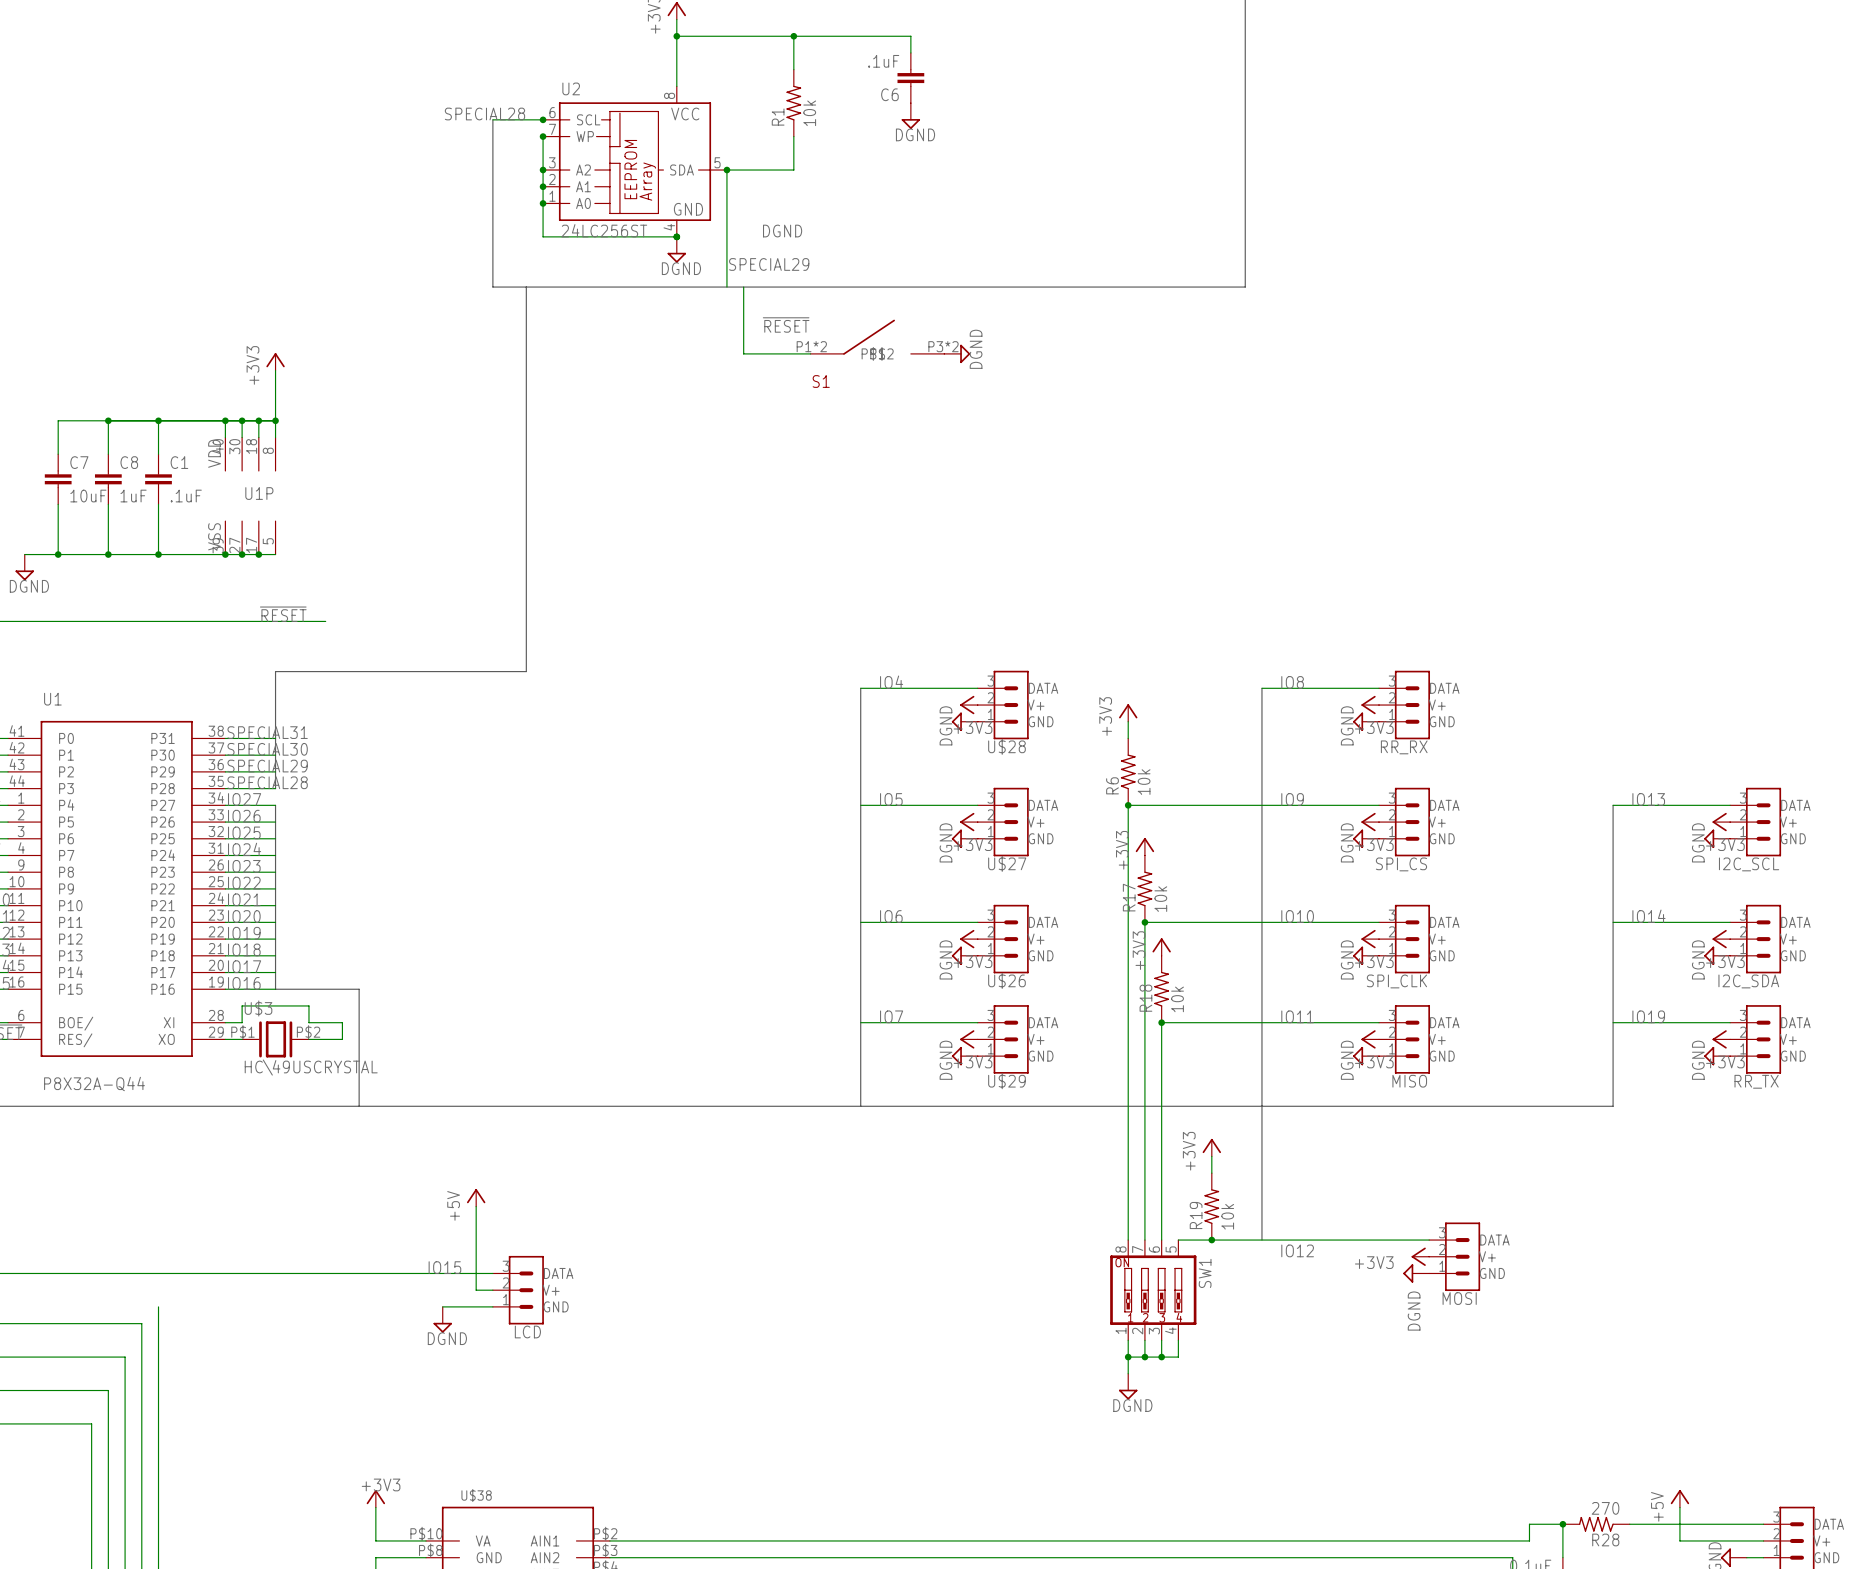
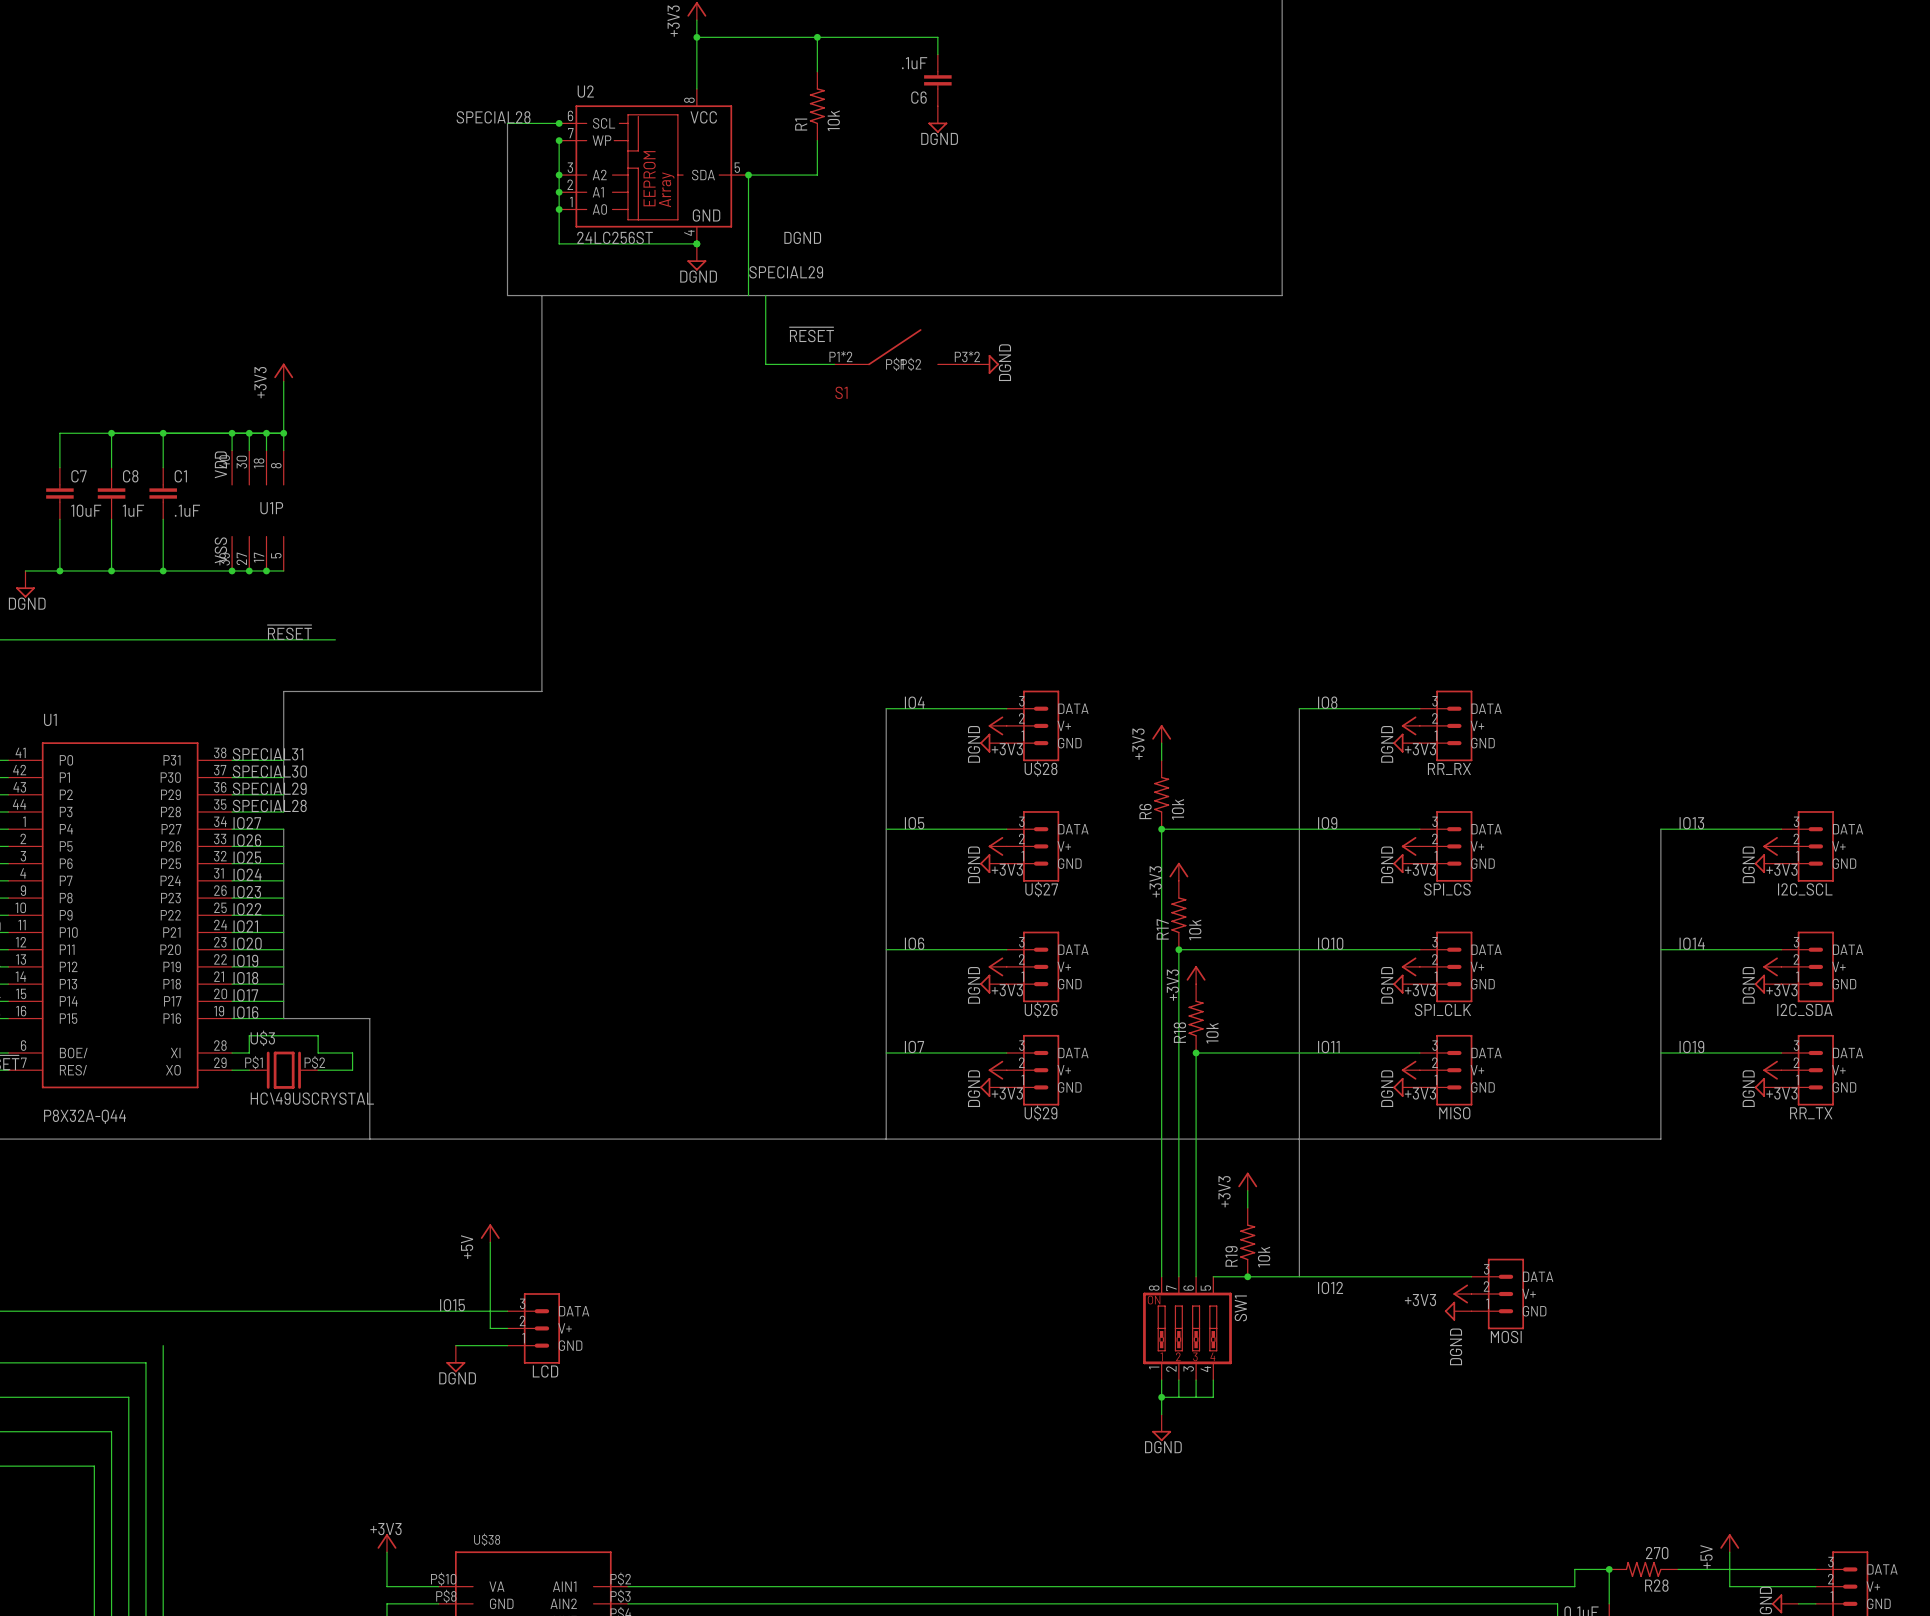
junction: (1144, 1357) -> none
junction: (1161, 1357) -> none

